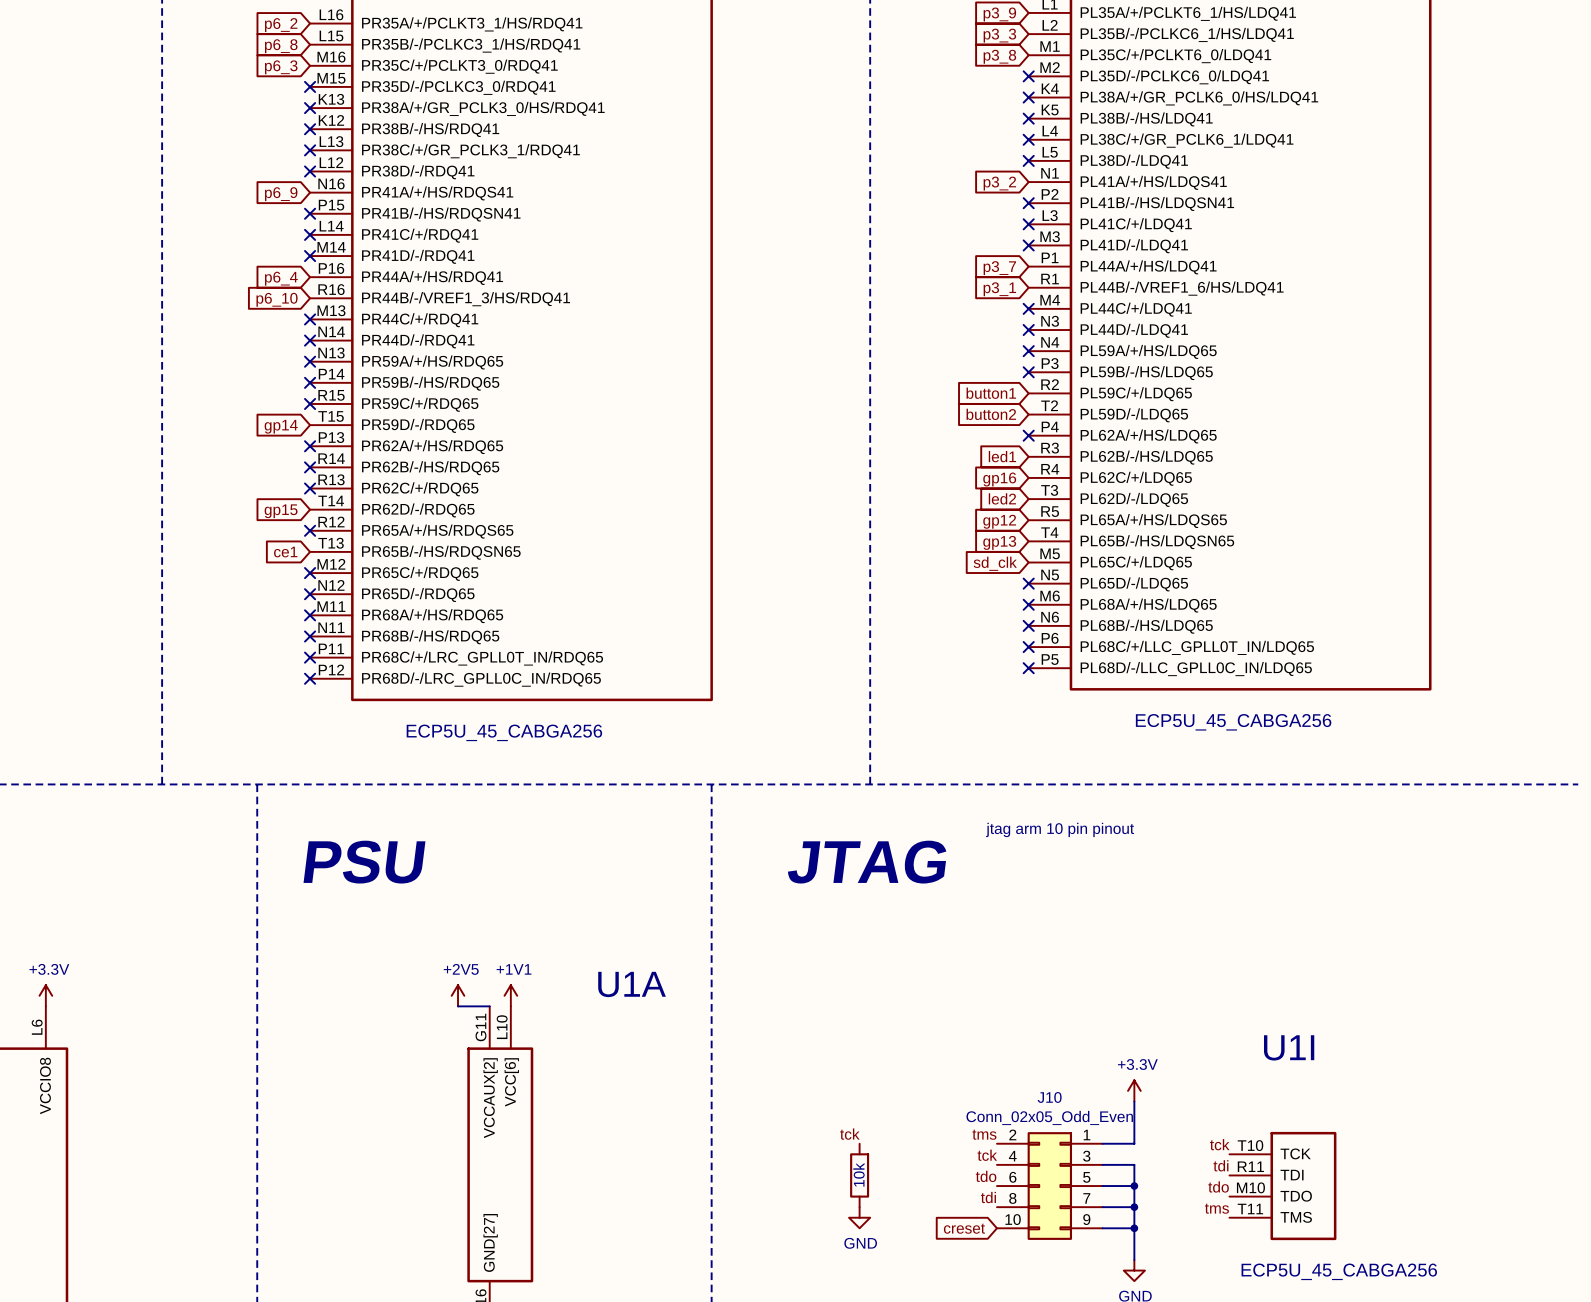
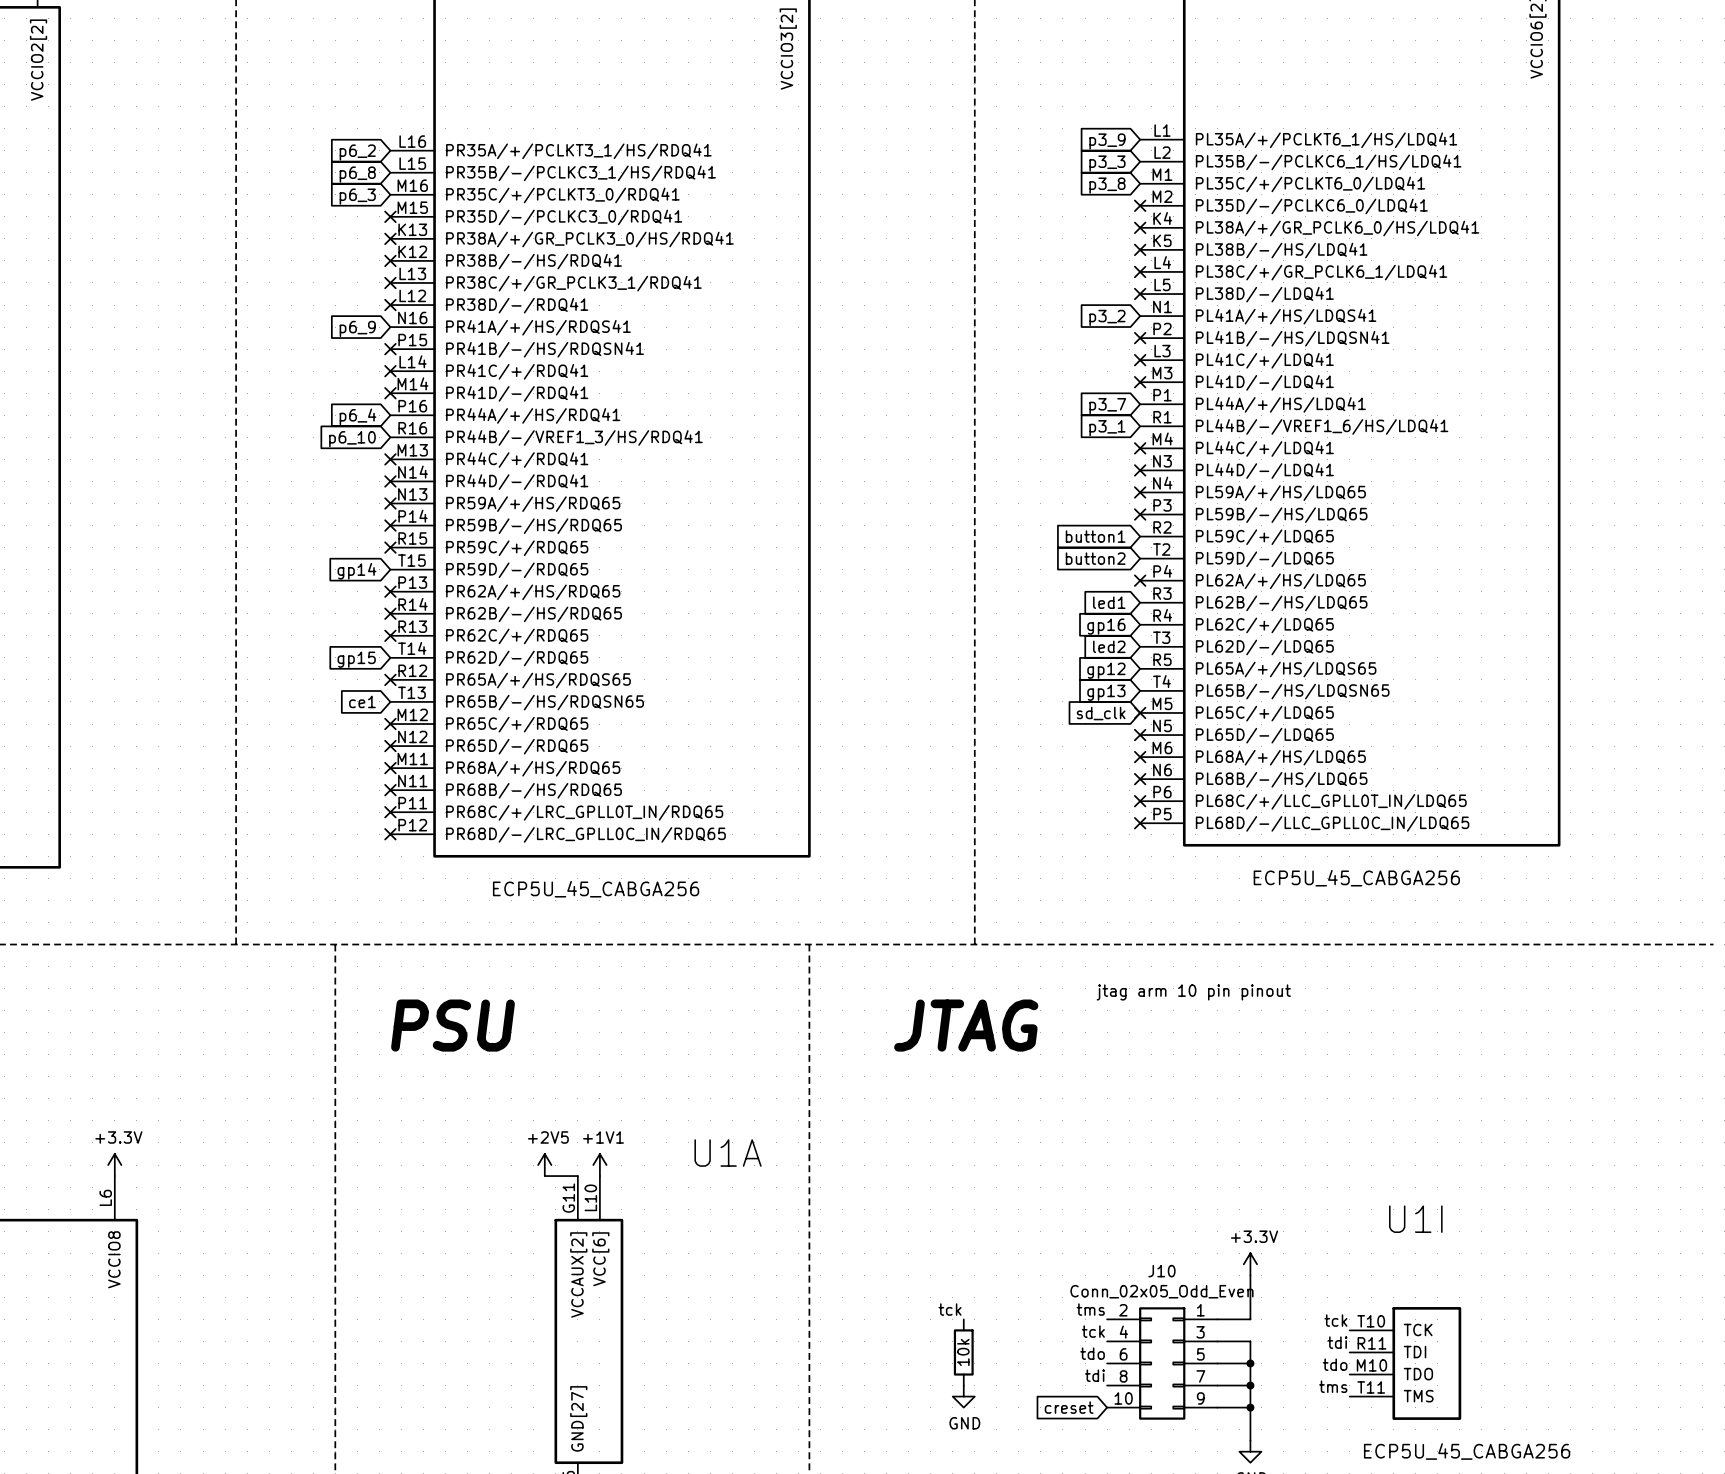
no-connect mark: none -> (1140, 712)

